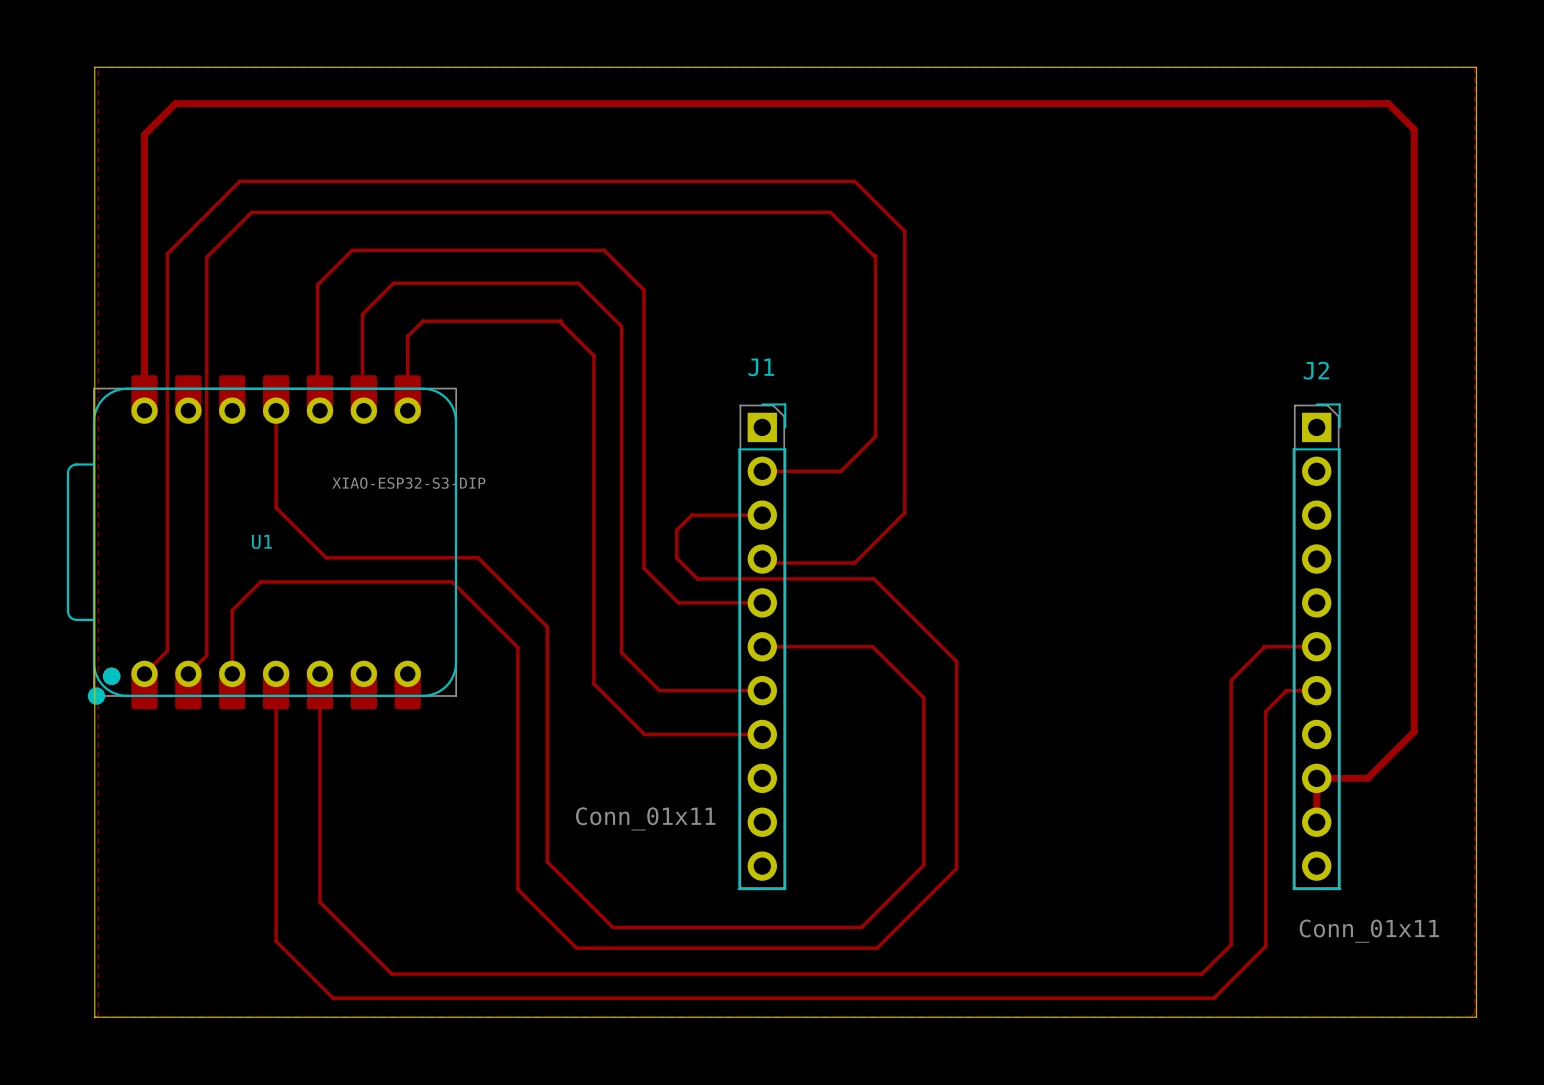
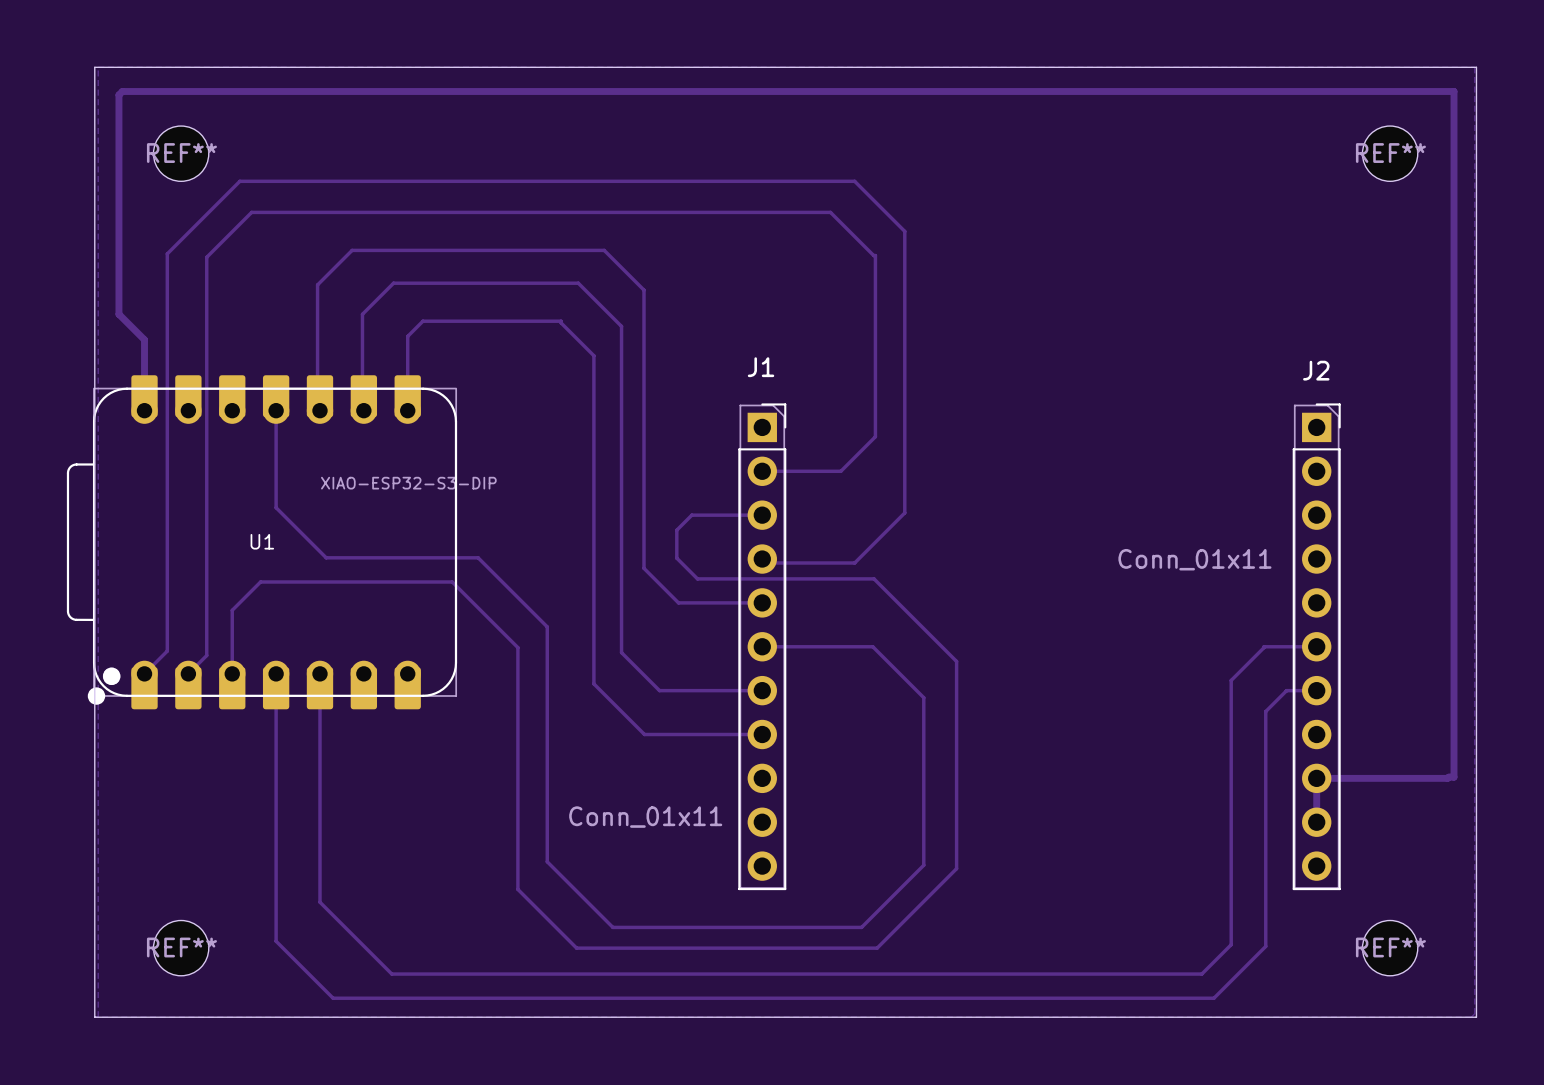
REF**: none -> (181, 153)
REF**: none -> (1390, 153)
track: (144, 339) (144, 134) (175, 103) (1388, 103) (1414, 129) (1414, 731) (1367, 778) -> (144, 339) (118, 314) (118, 94) (122, 91) (1454, 91) (1454, 777) (1367, 778)
J2 value position: Conn_01x11 (1369, 931) -> Conn_01x11 (1194, 559)
REF**: none -> (181, 948)
REF**: none -> (1390, 948)

